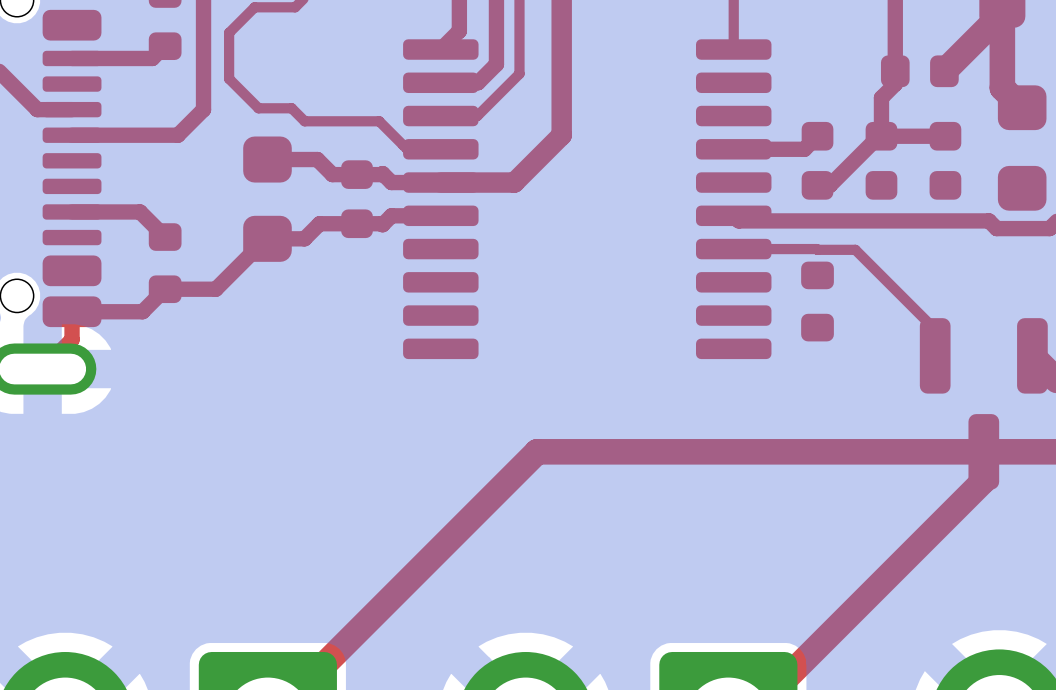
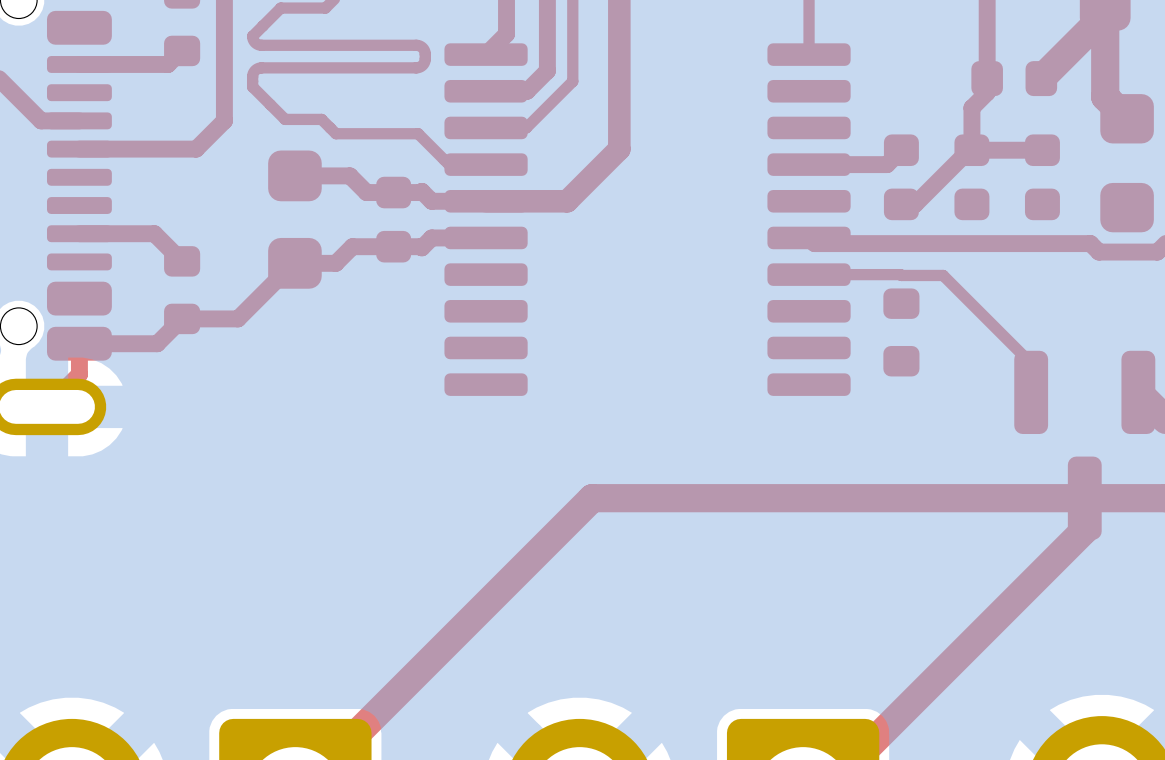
top track: (229, 32) (229, 69) -> (252, 36) (255, 42) (260, 45) (416, 45) (422, 47) (425, 54) (424, 63) (417, 67) (261, 67) (255, 70) (252, 76)

